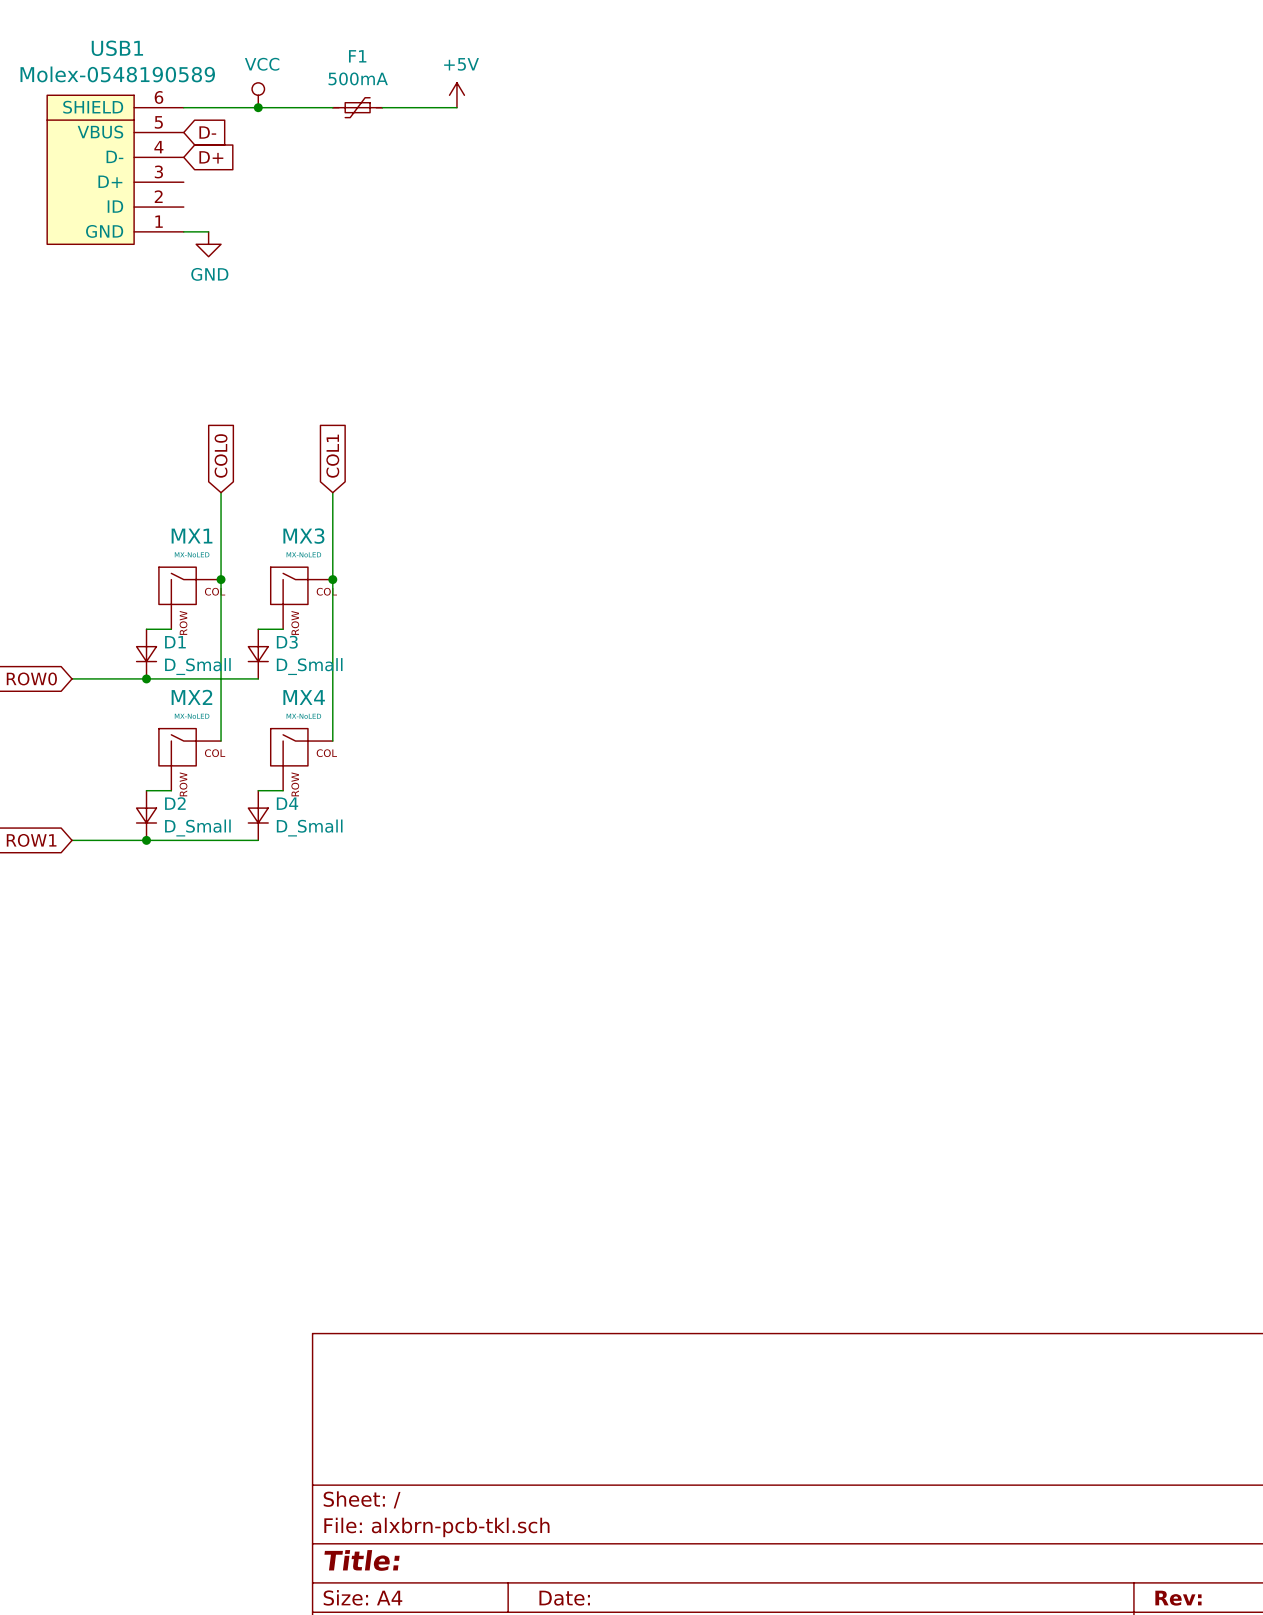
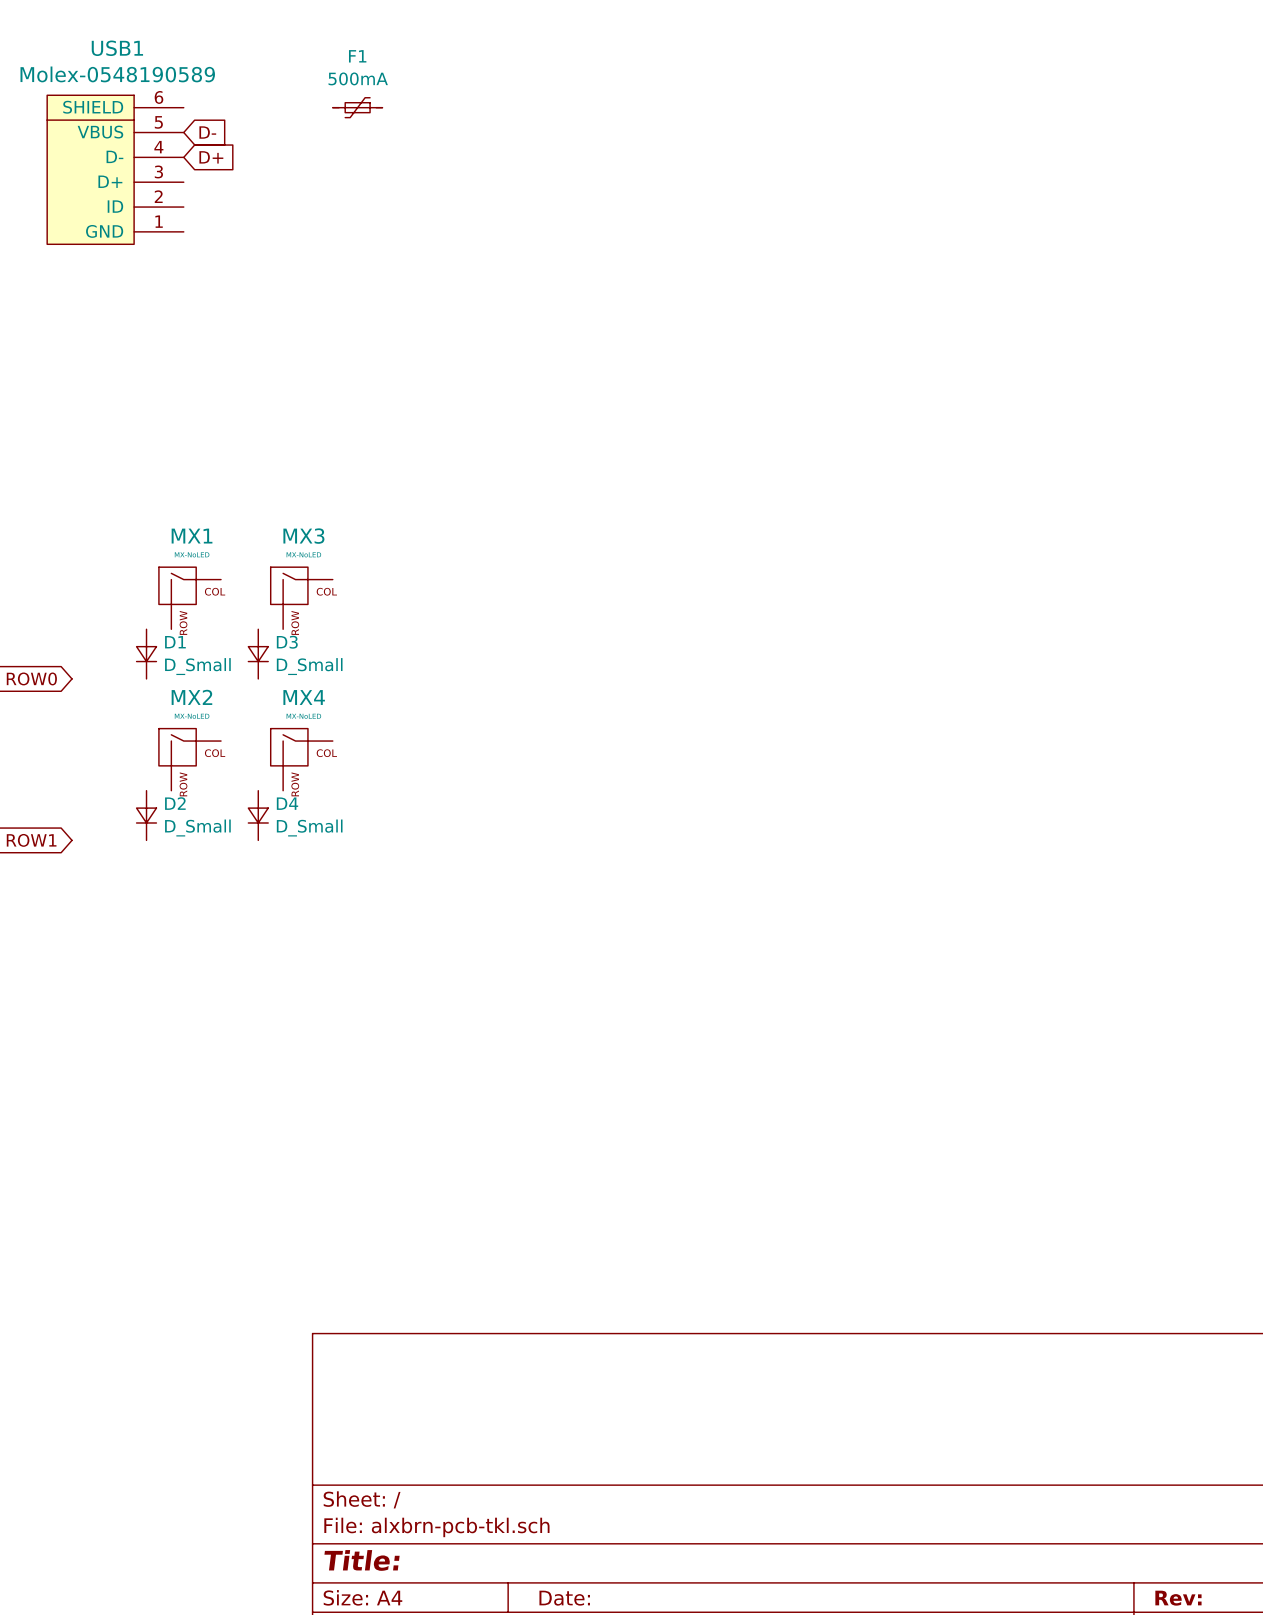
power symbol: VCC (258, 95) -> none
power symbol: +5V (456, 95) -> none
wire: (183, 107) (332, 107) -> none
junction: (258, 107) -> none
wire: (382, 107) (456, 107) -> none
wire: (183, 231) (208, 231) -> none
power symbol: GND (208, 244) -> none
global label: COL0 (221, 455) -> none
global label: COL1 (332, 456) -> none
wire: (221, 492) (221, 741) -> none
wire: (332, 492) (332, 741) -> none
junction: (221, 579) -> none
junction: (332, 579) -> none
wire: (146, 629) (171, 629) -> none
wire: (258, 629) (283, 629) -> none
wire: (72, 678) (258, 678) -> none
junction: (146, 678) -> none
wire: (146, 790) (171, 790) -> none
wire: (258, 790) (283, 790) -> none
wire: (72, 840) (258, 840) -> none
junction: (146, 840) -> none

